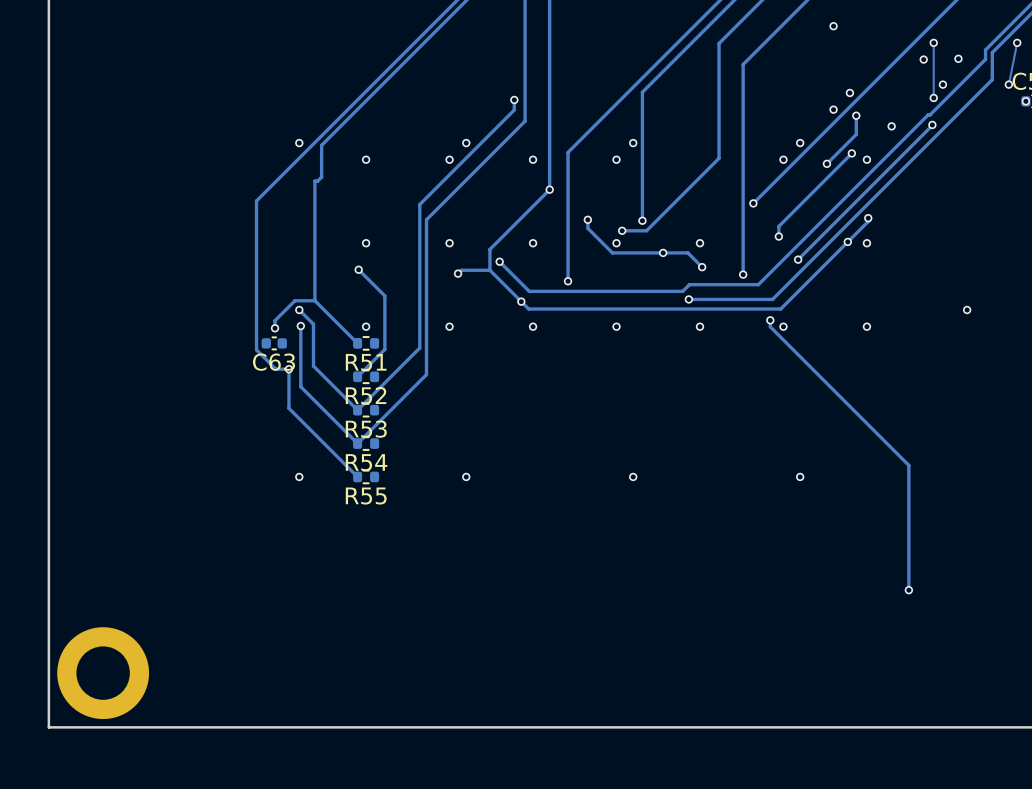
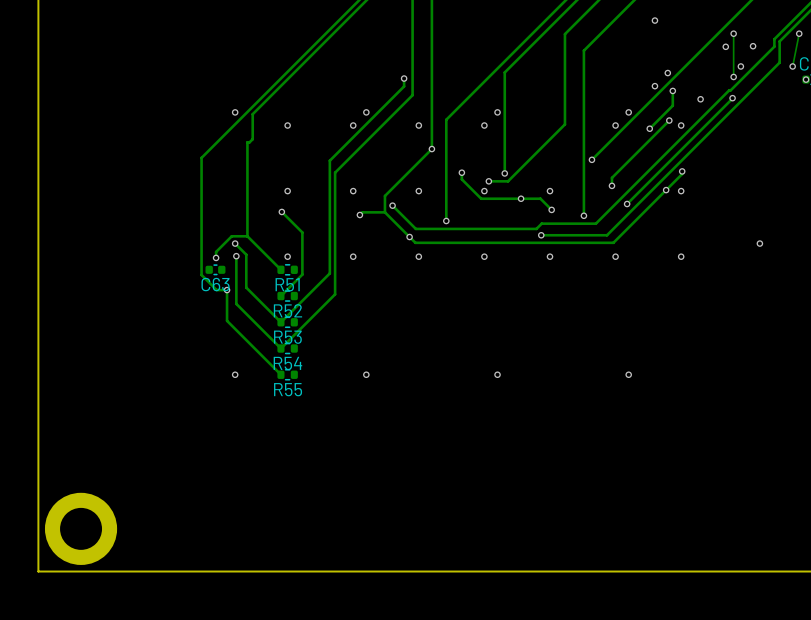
track: (770, 320) (770, 326) (908, 465) (908, 590) -> none
via: (770, 320) -> none
via: (908, 590) -> none

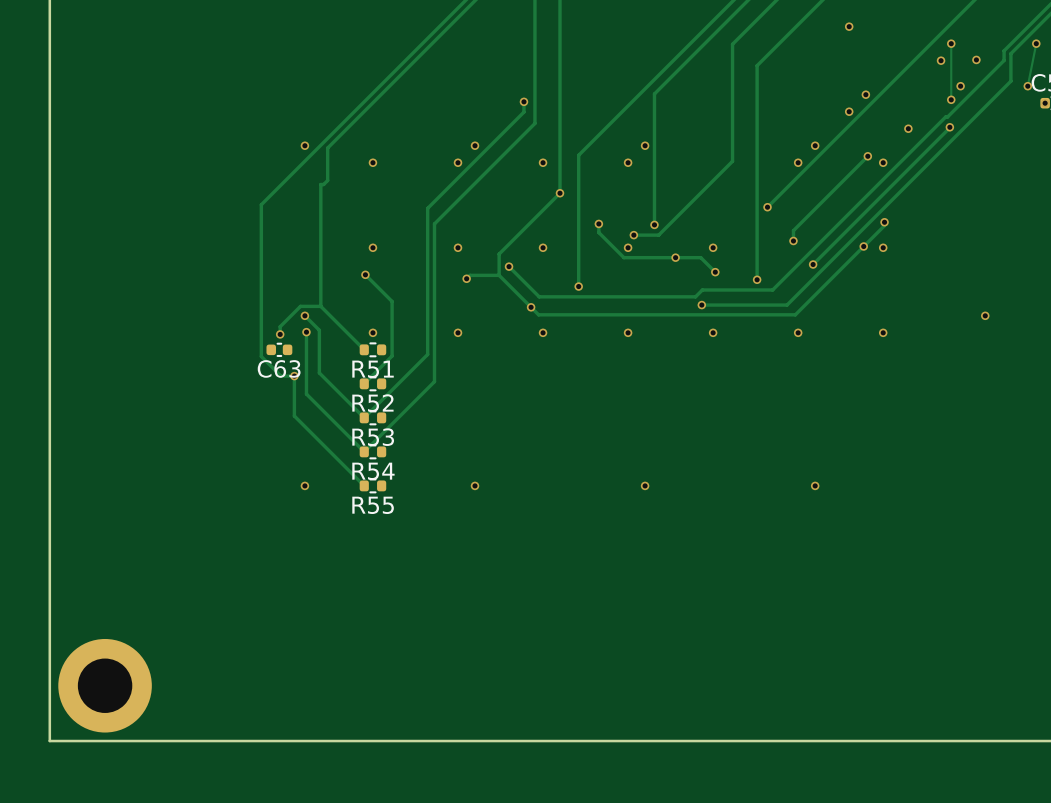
track: (672, 90) (672, 105) (649, 128) -> none
via: (672, 90) -> none
via: (649, 128) -> none

